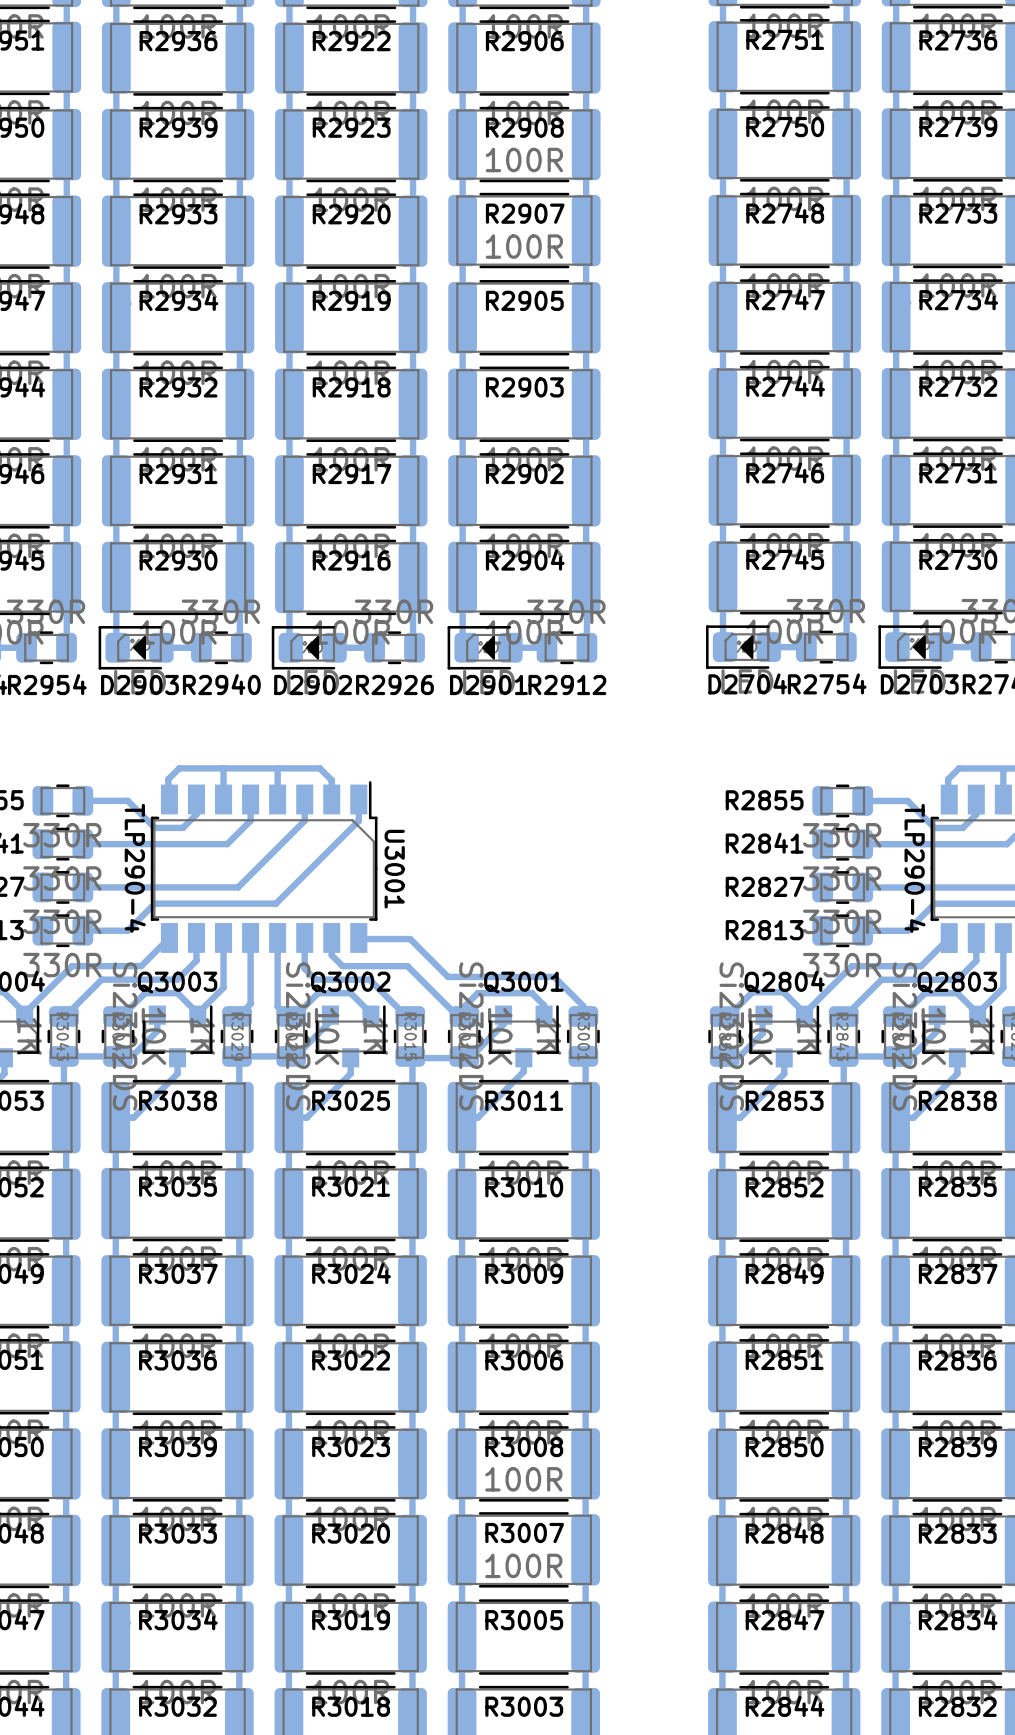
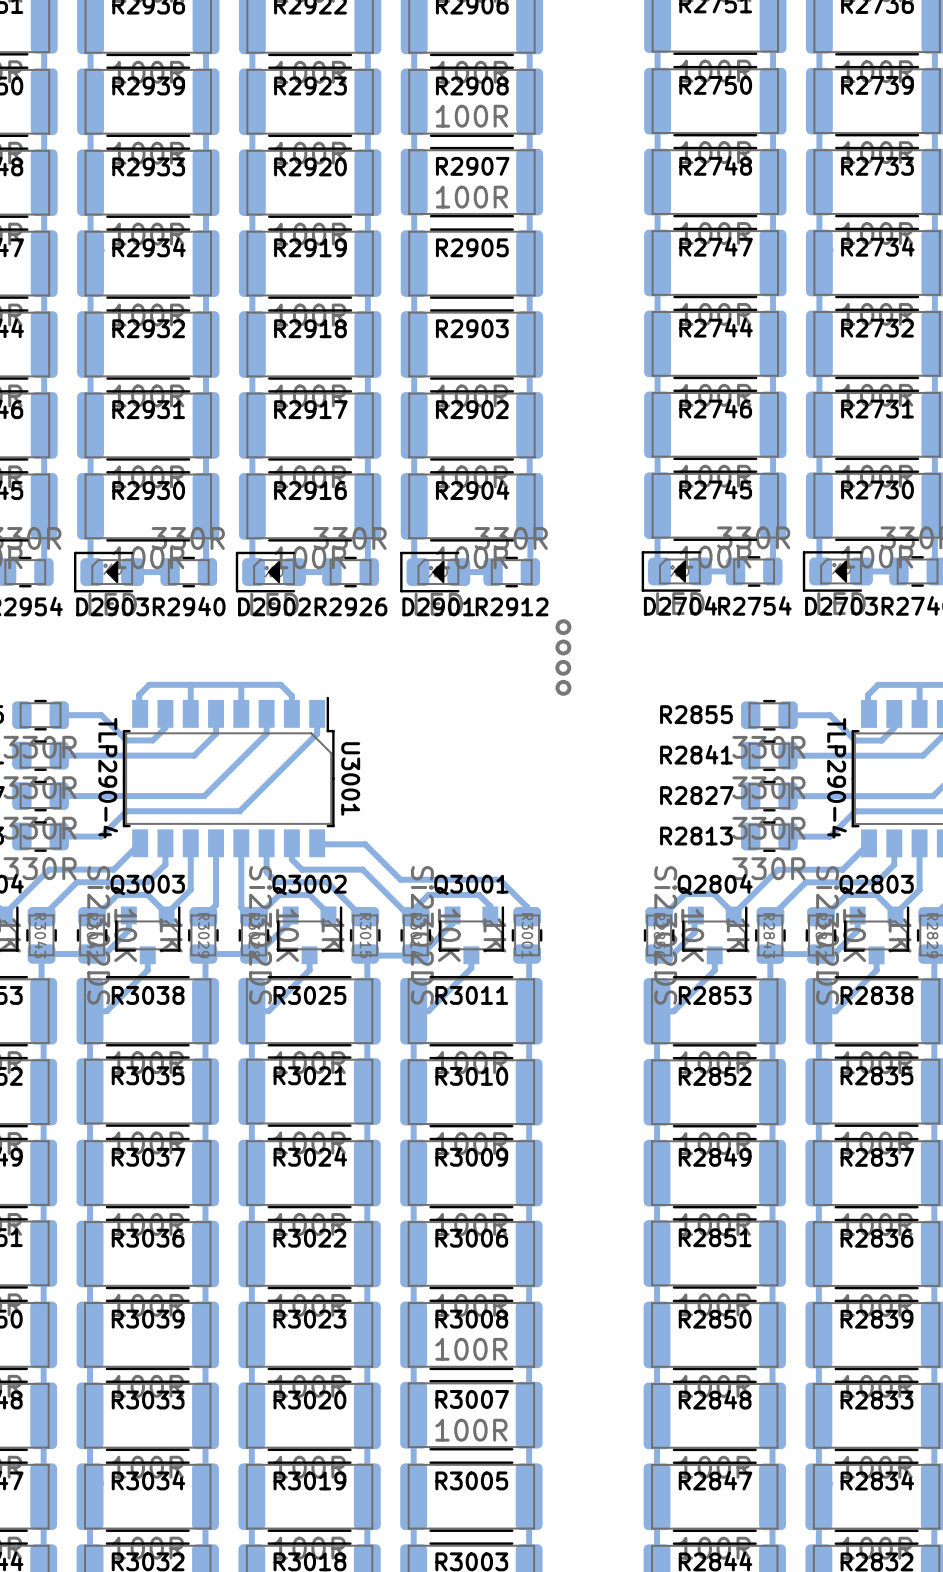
via: none -> (563, 627)
via: none -> (563, 647)
via: none -> (563, 667)
via: none -> (563, 687)

